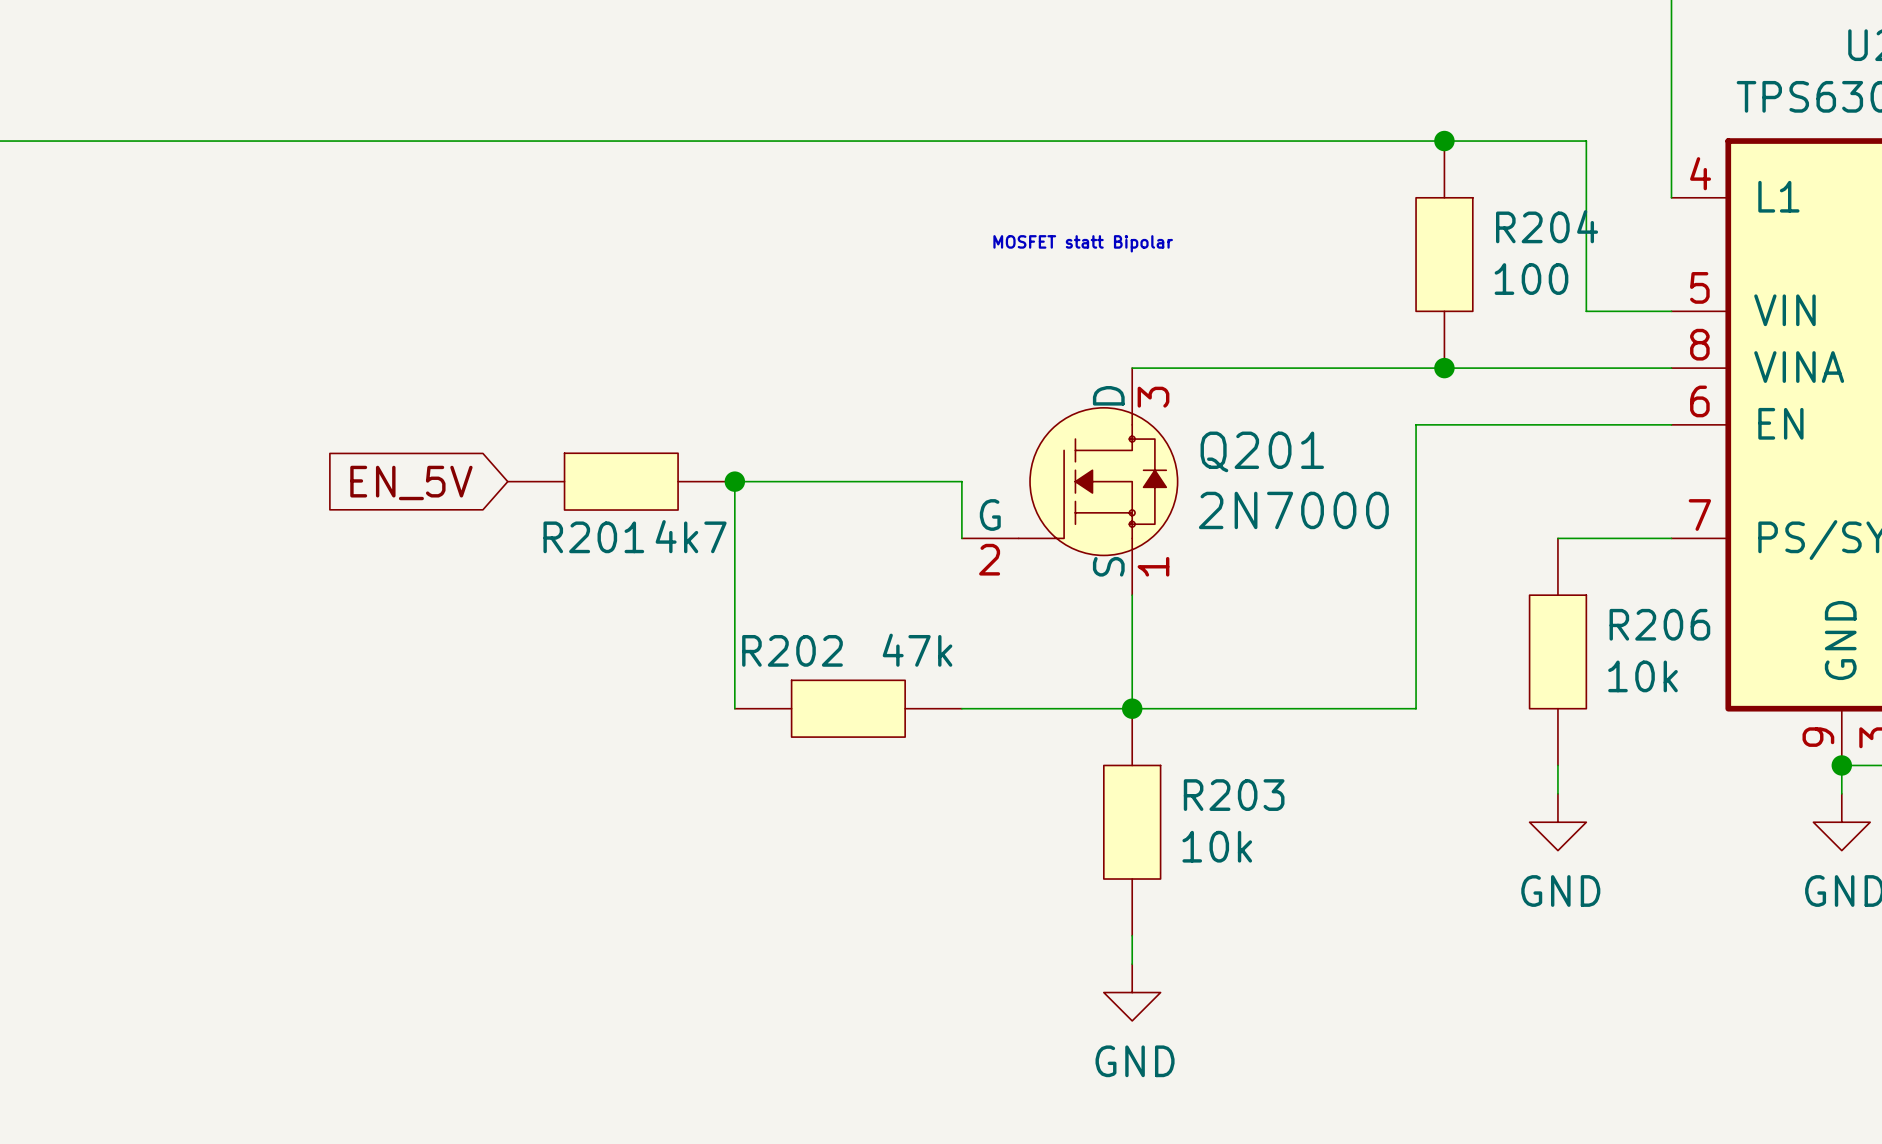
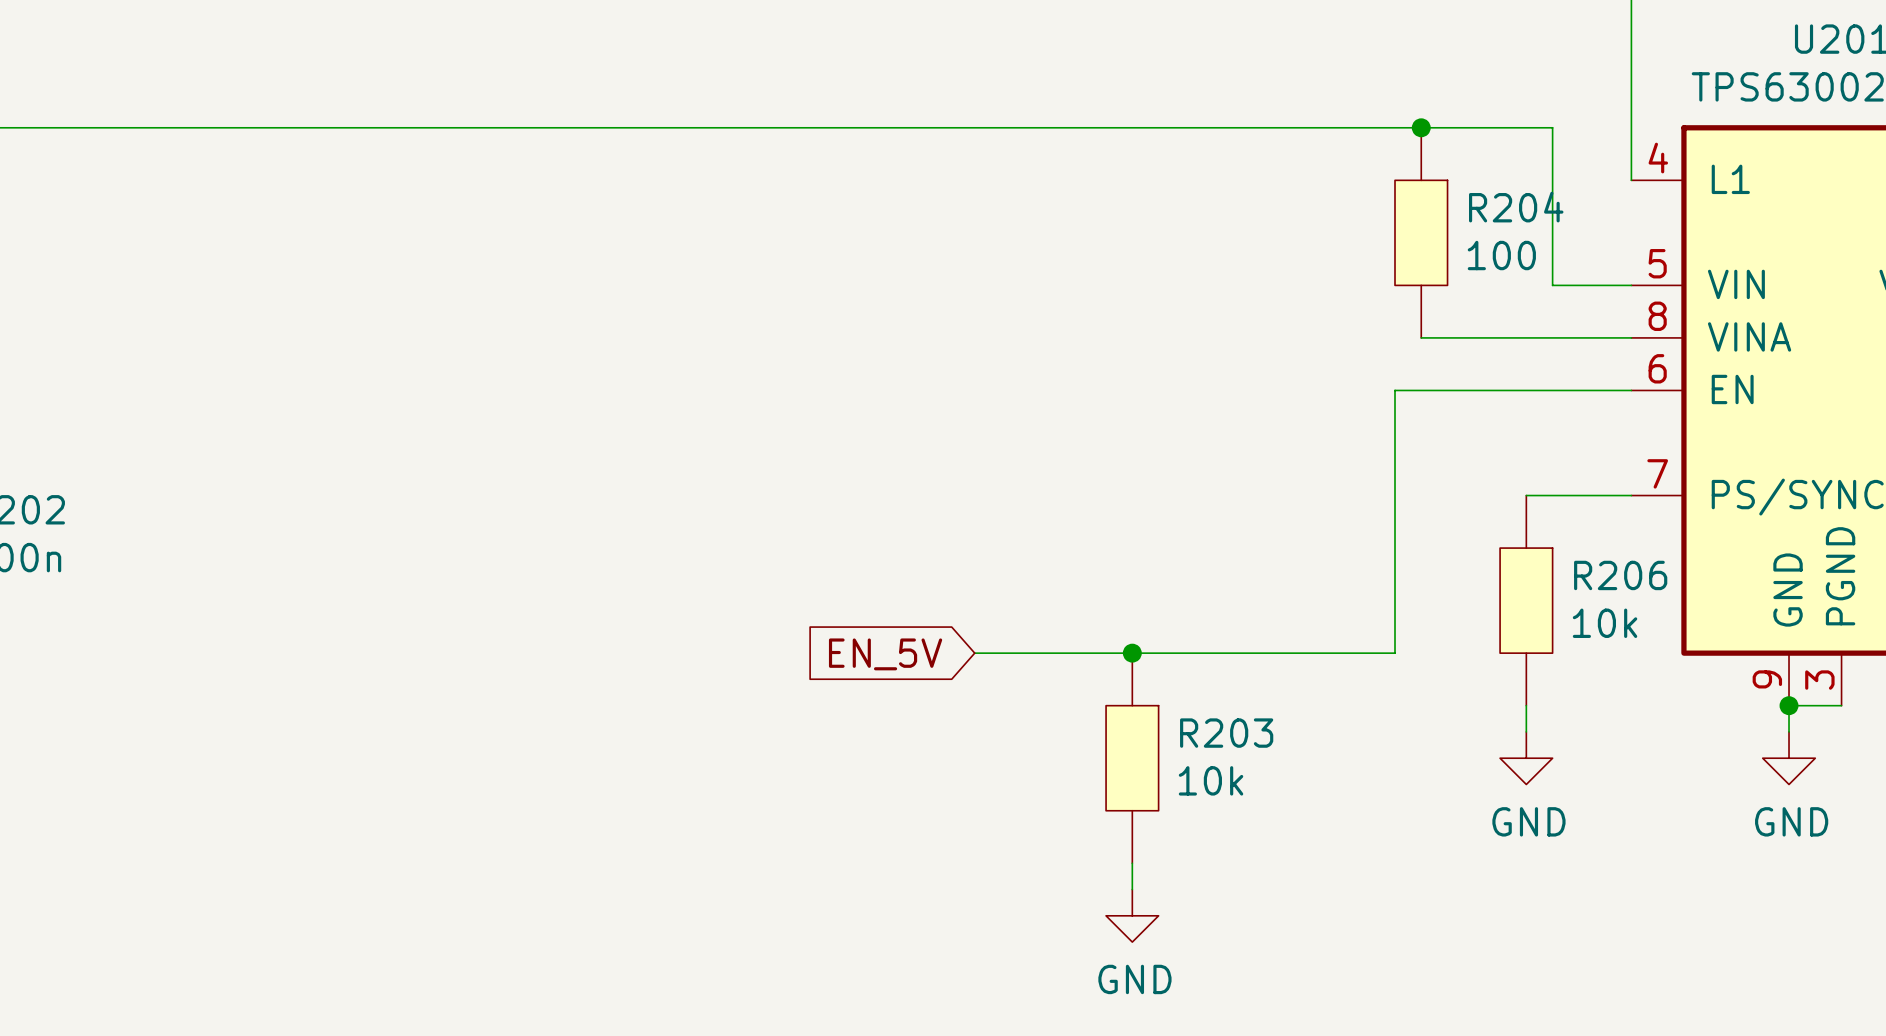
text: MOSFET statt Bipolar (1083, 243) -> none
wire: (1132, 368) (1444, 368) -> none
junction: (1444, 368) -> none
R201: 4k7 (621, 481) -> none
junction: (734, 481) -> none
Q201: 2N7000 (1069, 481) -> none
global label position: EN_5V (411, 482) -> EN_5V (885, 654)
wire: (961, 538) (961, 481) (734, 481) (734, 708) -> none
wire: (1132, 595) (1132, 708) -> none
R202: 47k (848, 708) -> none

